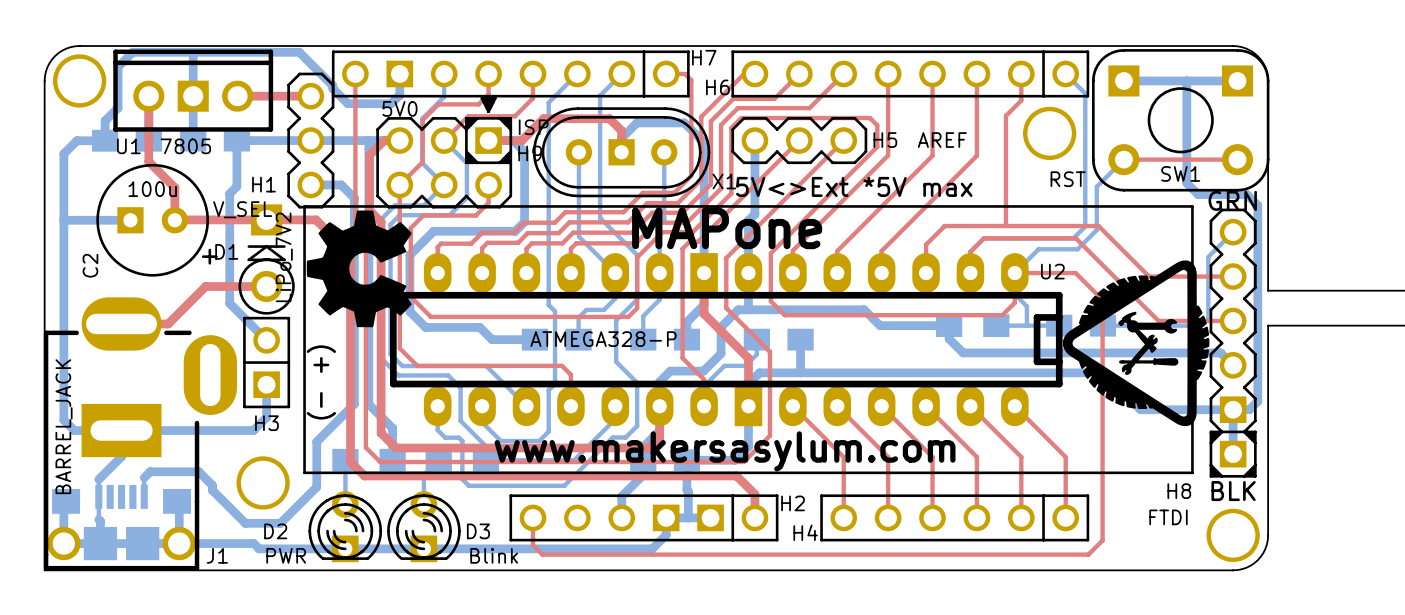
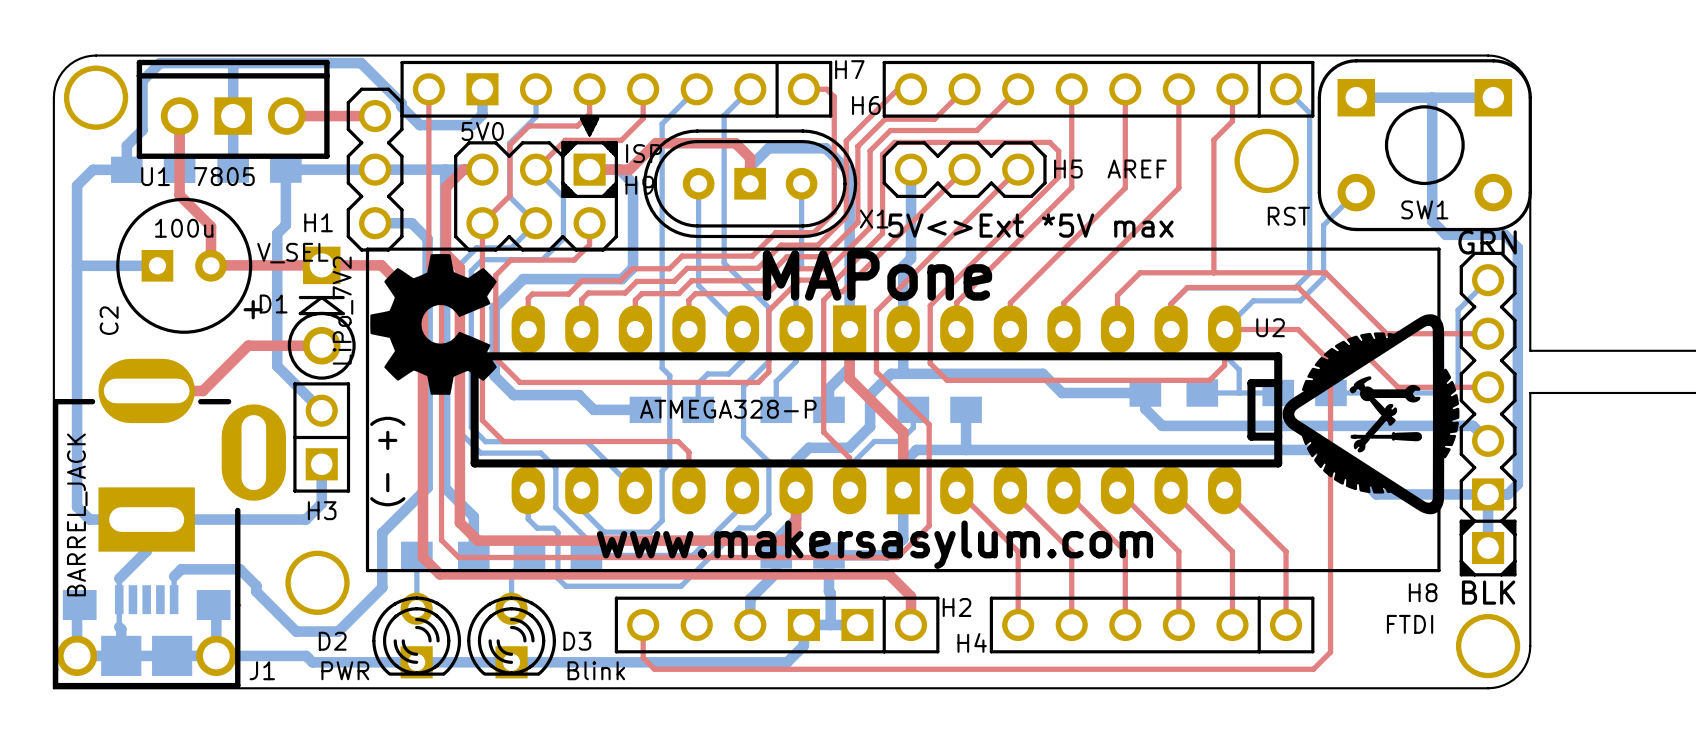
top track: (1123, 159) (1237, 159) -> none

